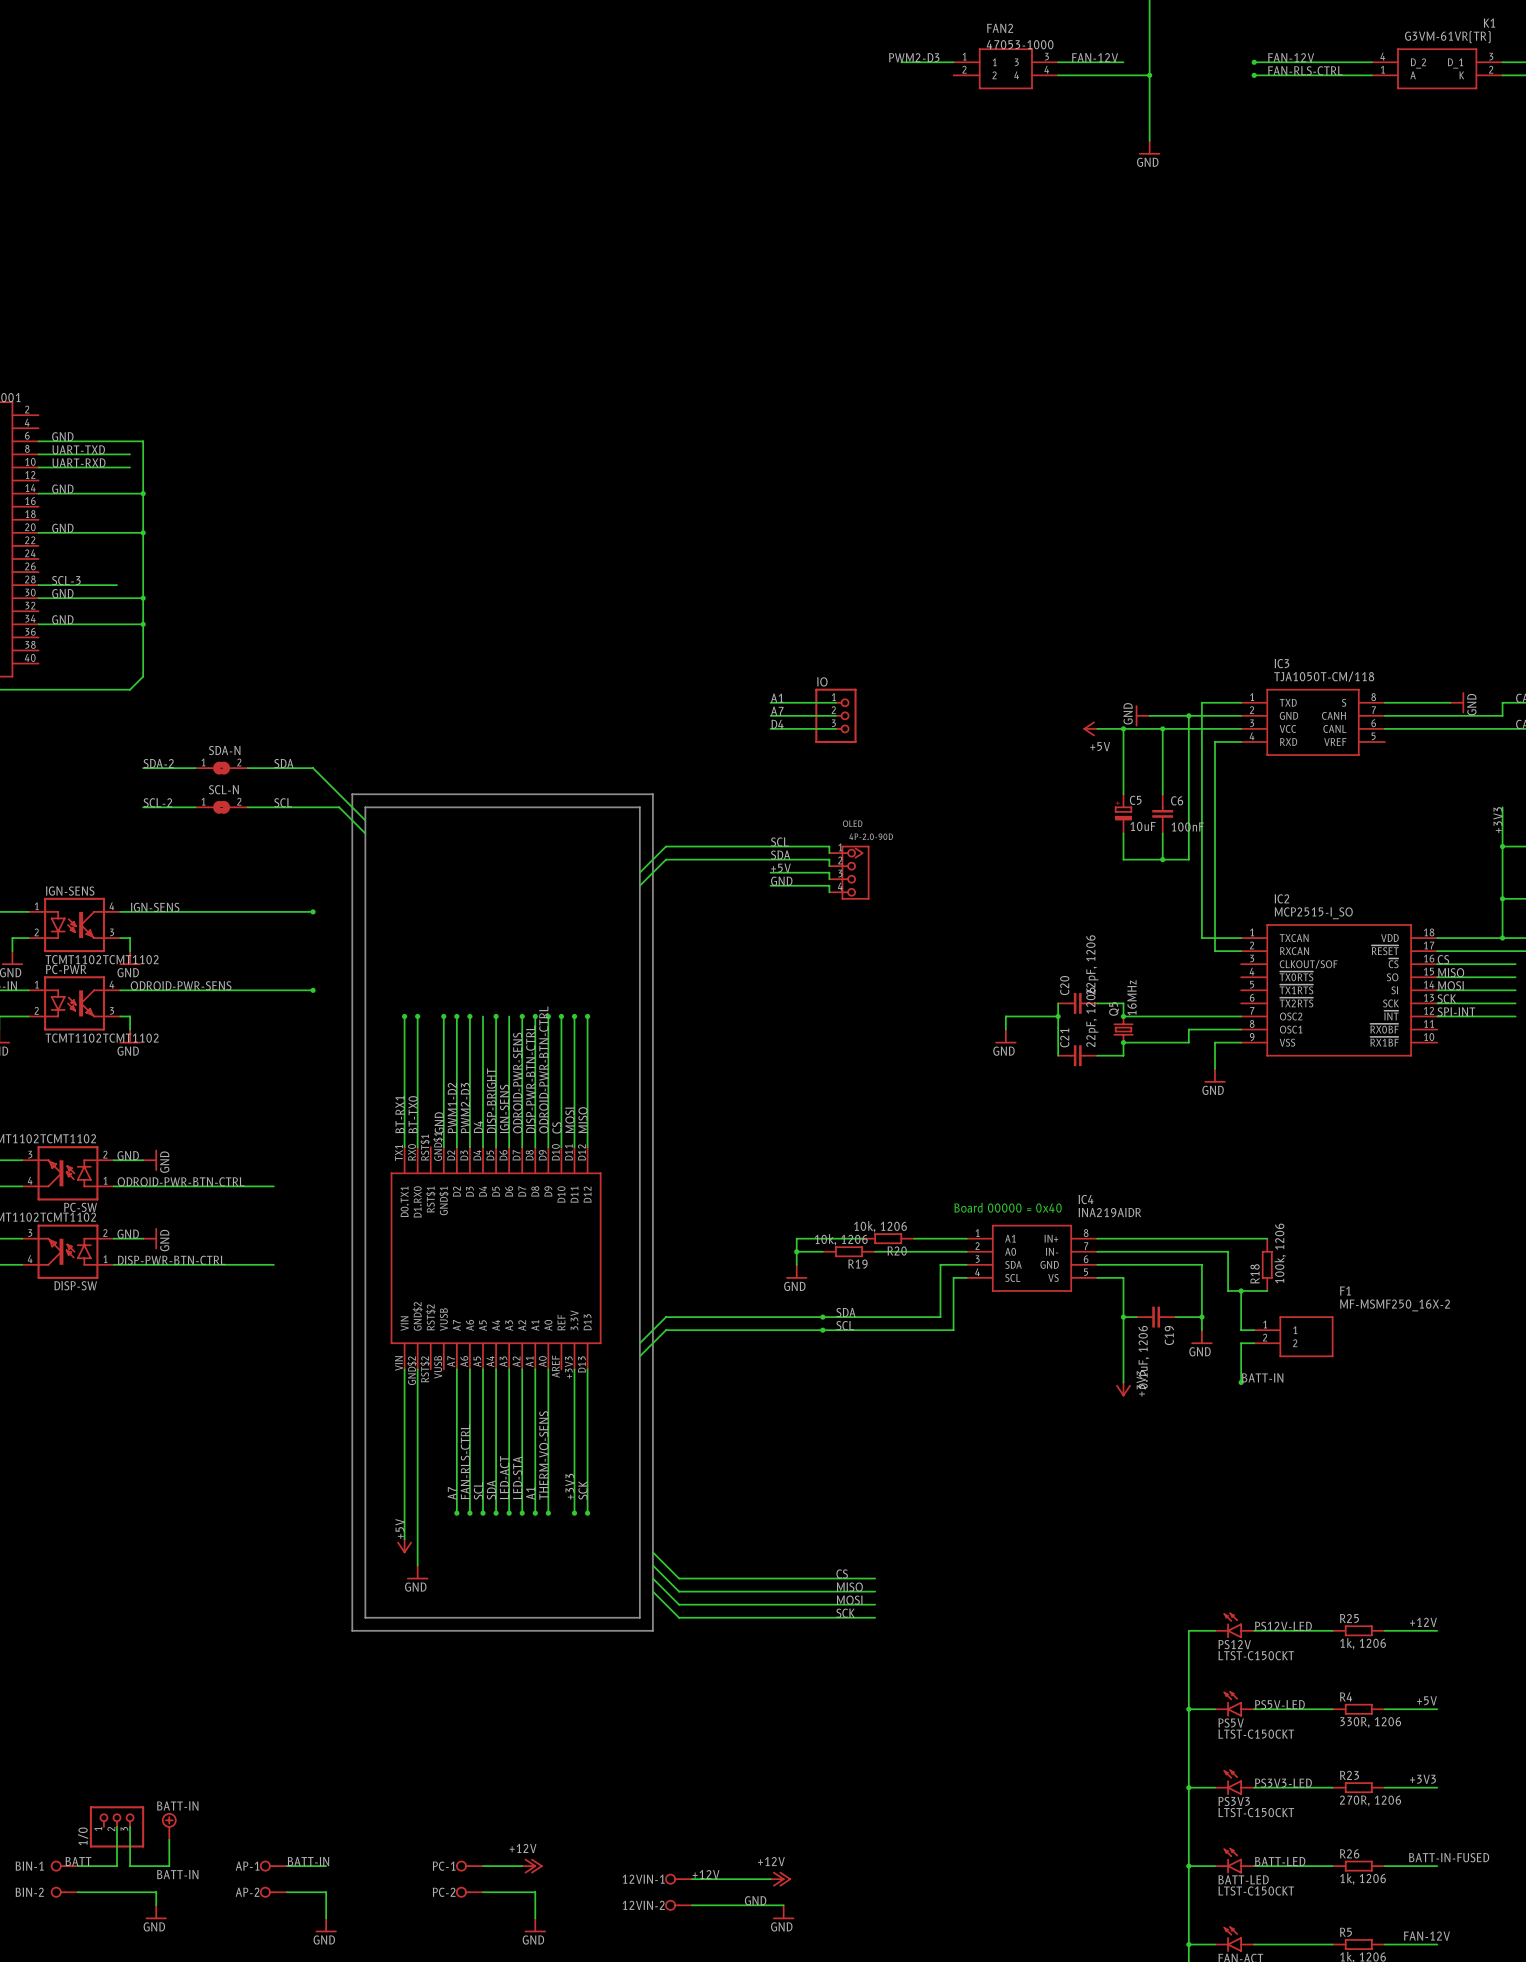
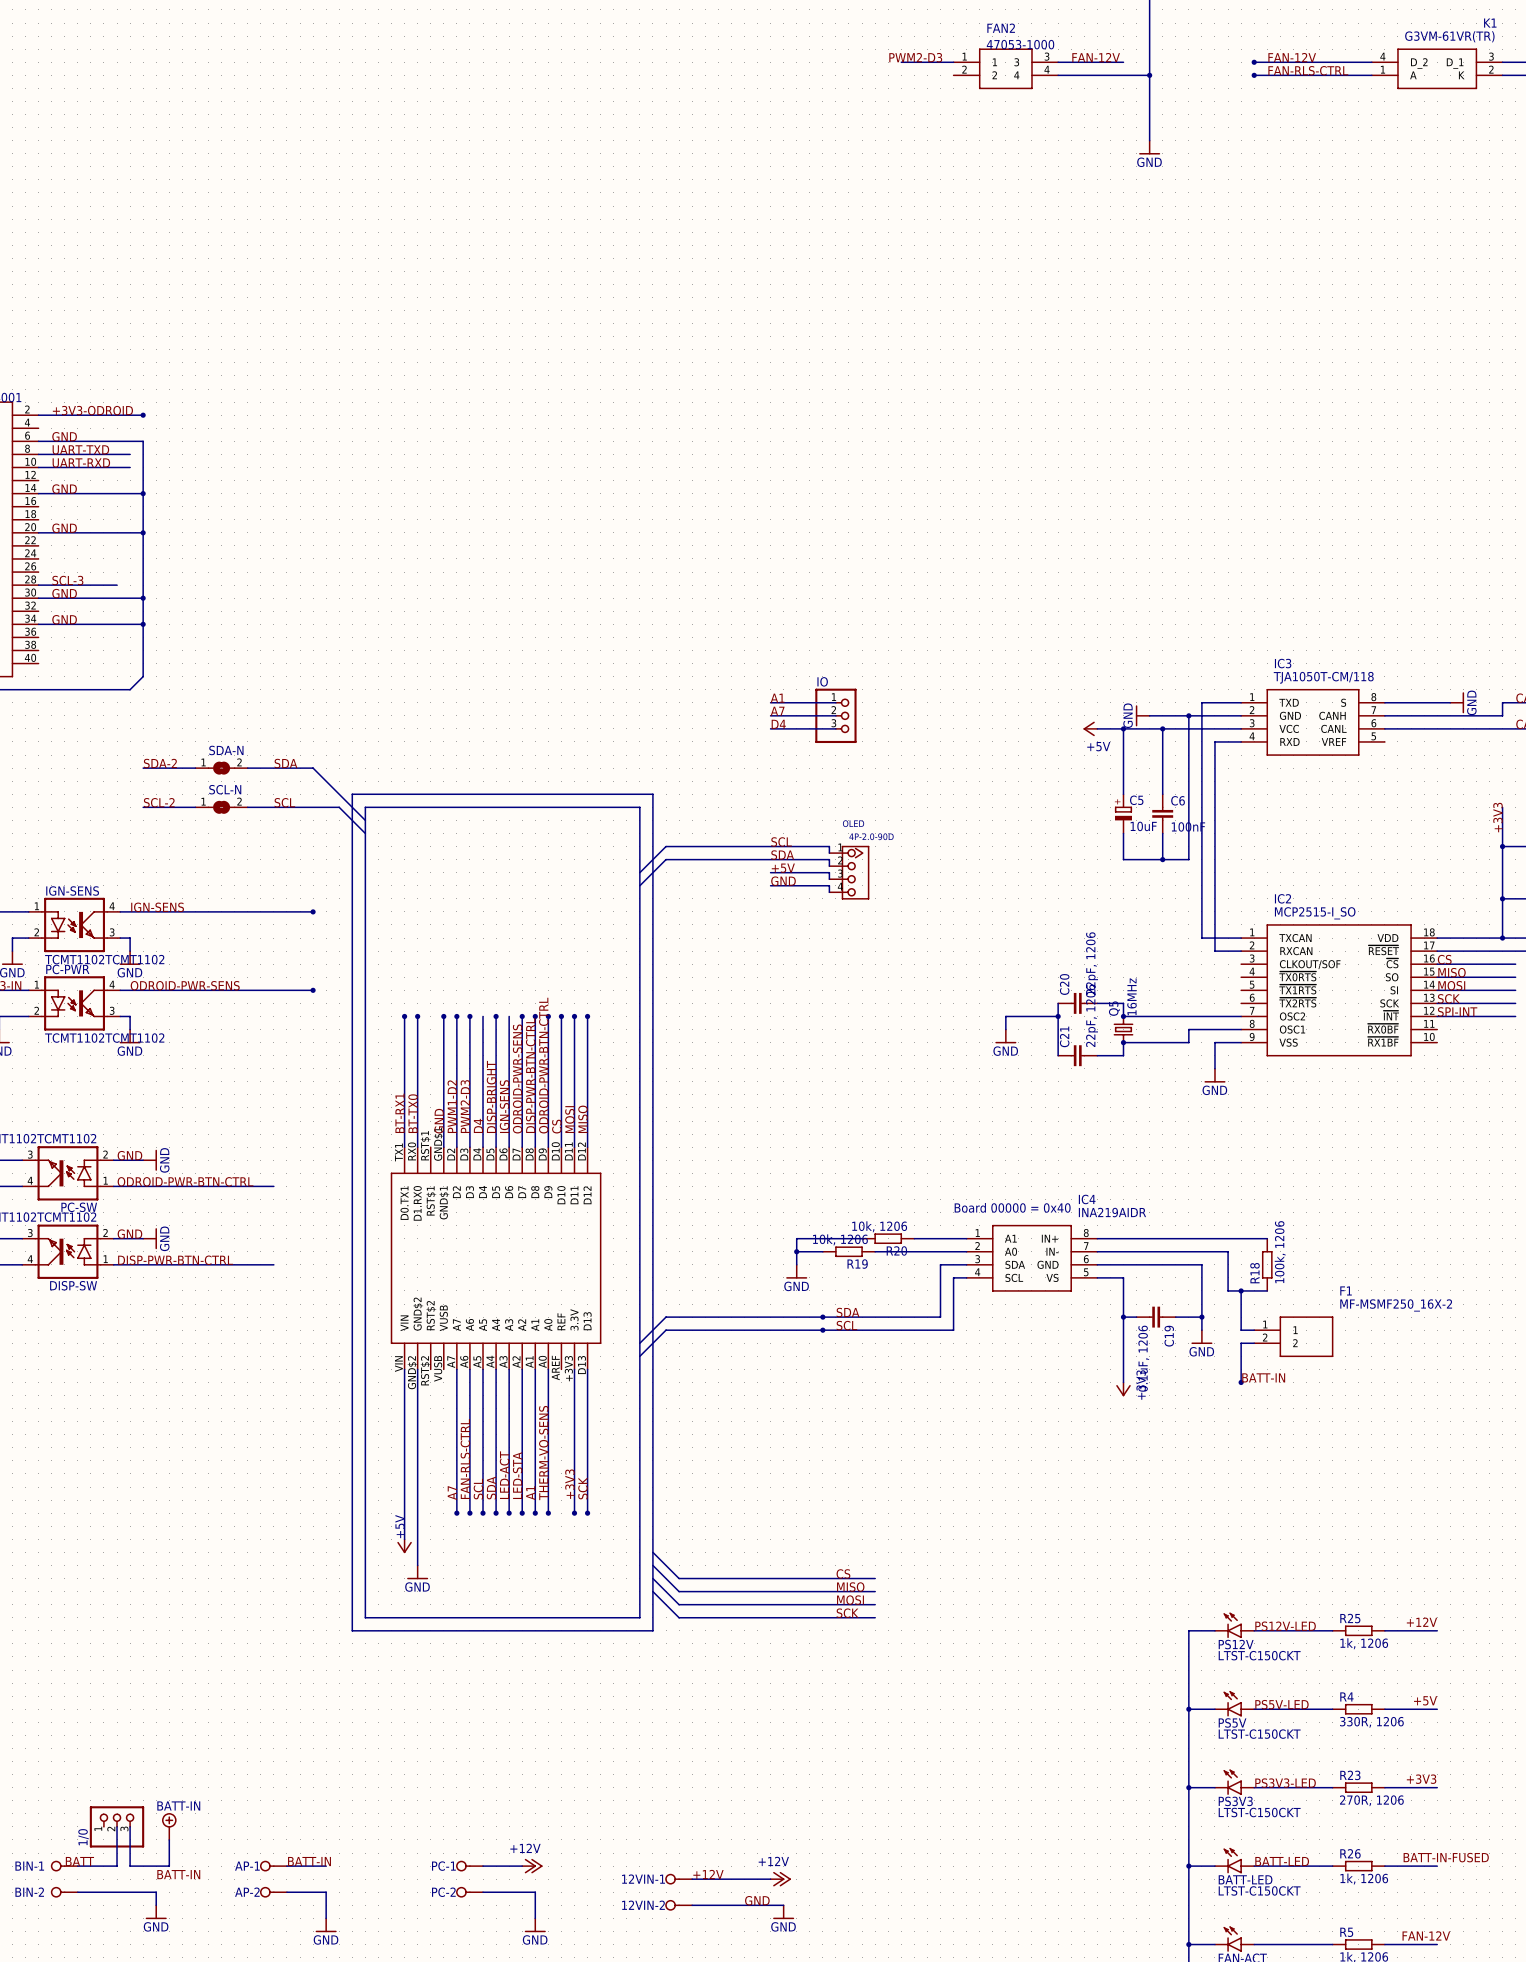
label: none -> +3V3-ODROID (92, 410)
wire: none -> (38, 415) (143, 415)
junction: none -> (143, 415)

